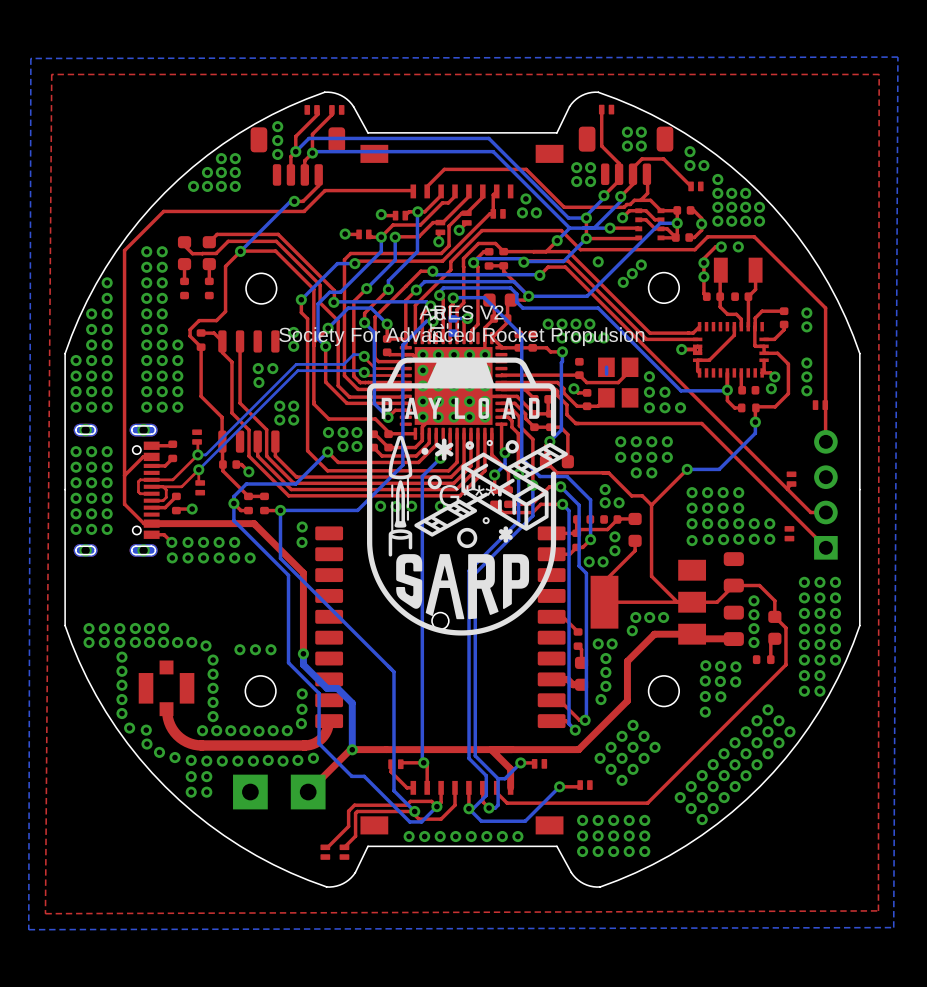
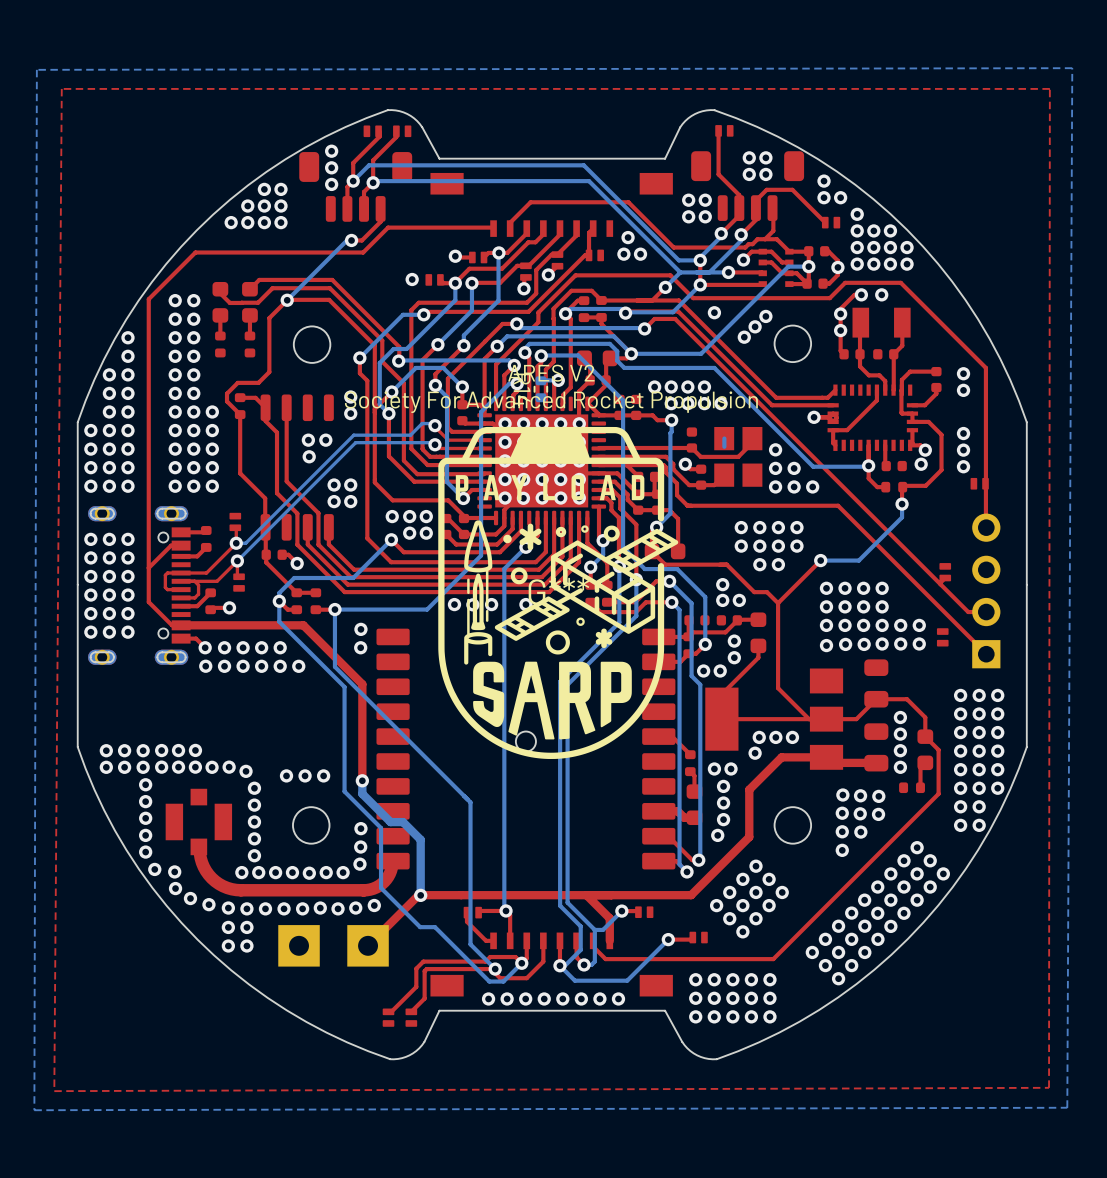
top track: (359, 234) (345, 234) -> none

